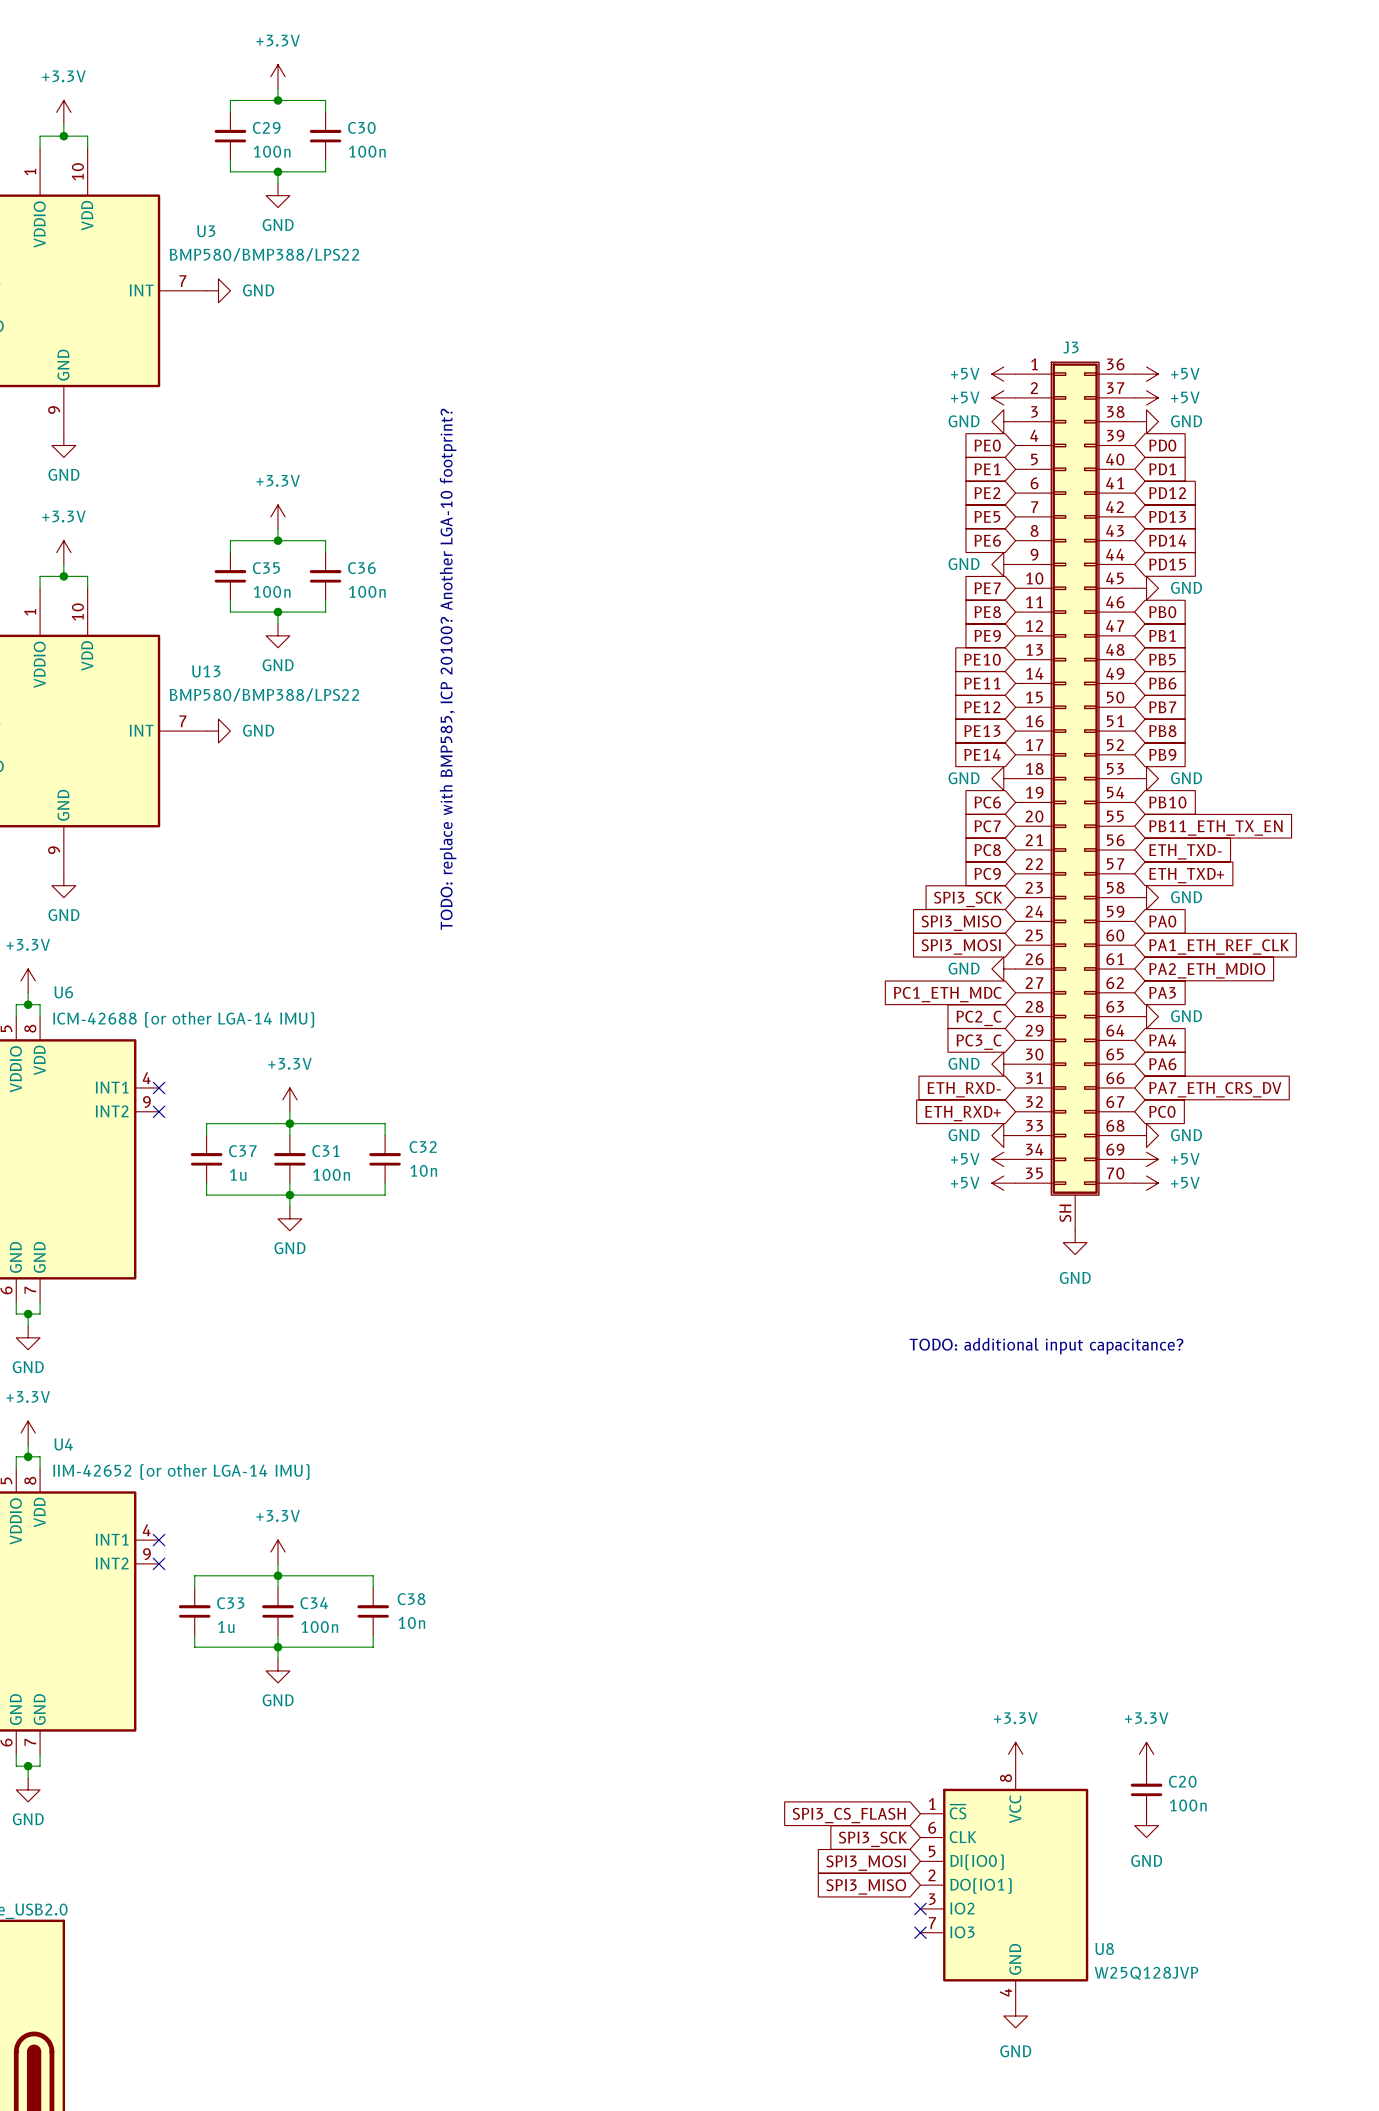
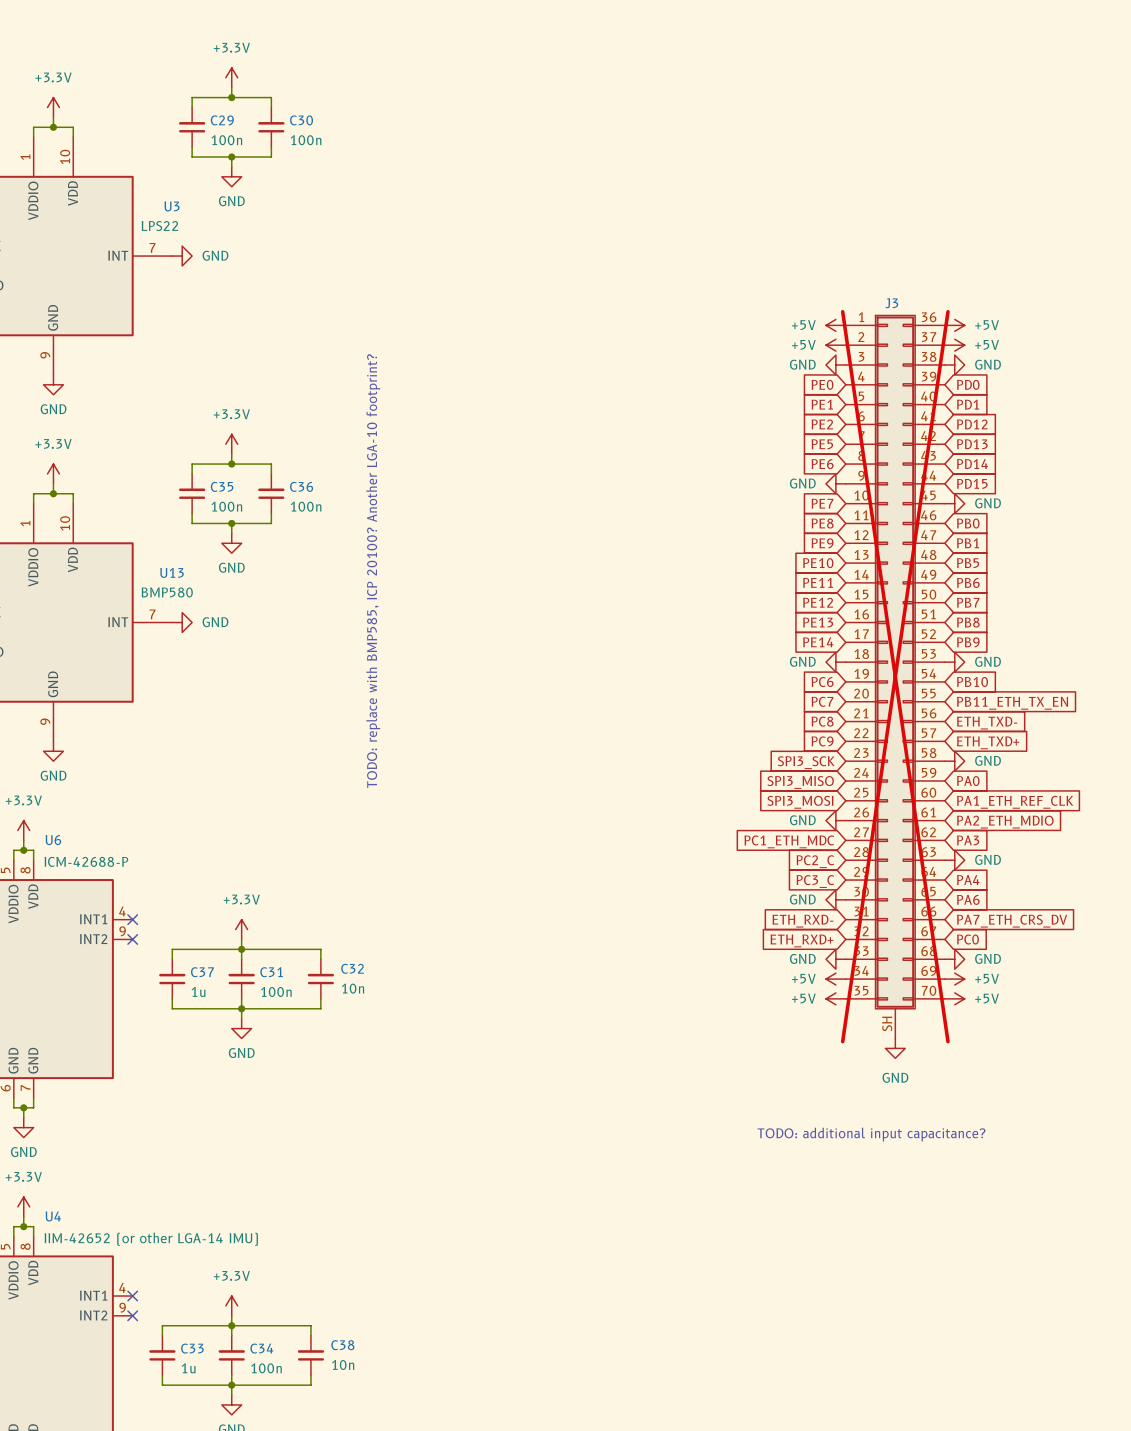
U3 value: BMP580/BMP388/LPS22 (264, 254) -> LPS22 (159, 226)
U13 value: BMP580/BMP388/LPS22 (264, 694) -> BMP580 (167, 592)
J3 do-not-place cross: none -> (895, 676)
U6 value: ICM-42688 (or other LGA-14 IMU) (183, 1019) -> ICM-42688-P (86, 861)

